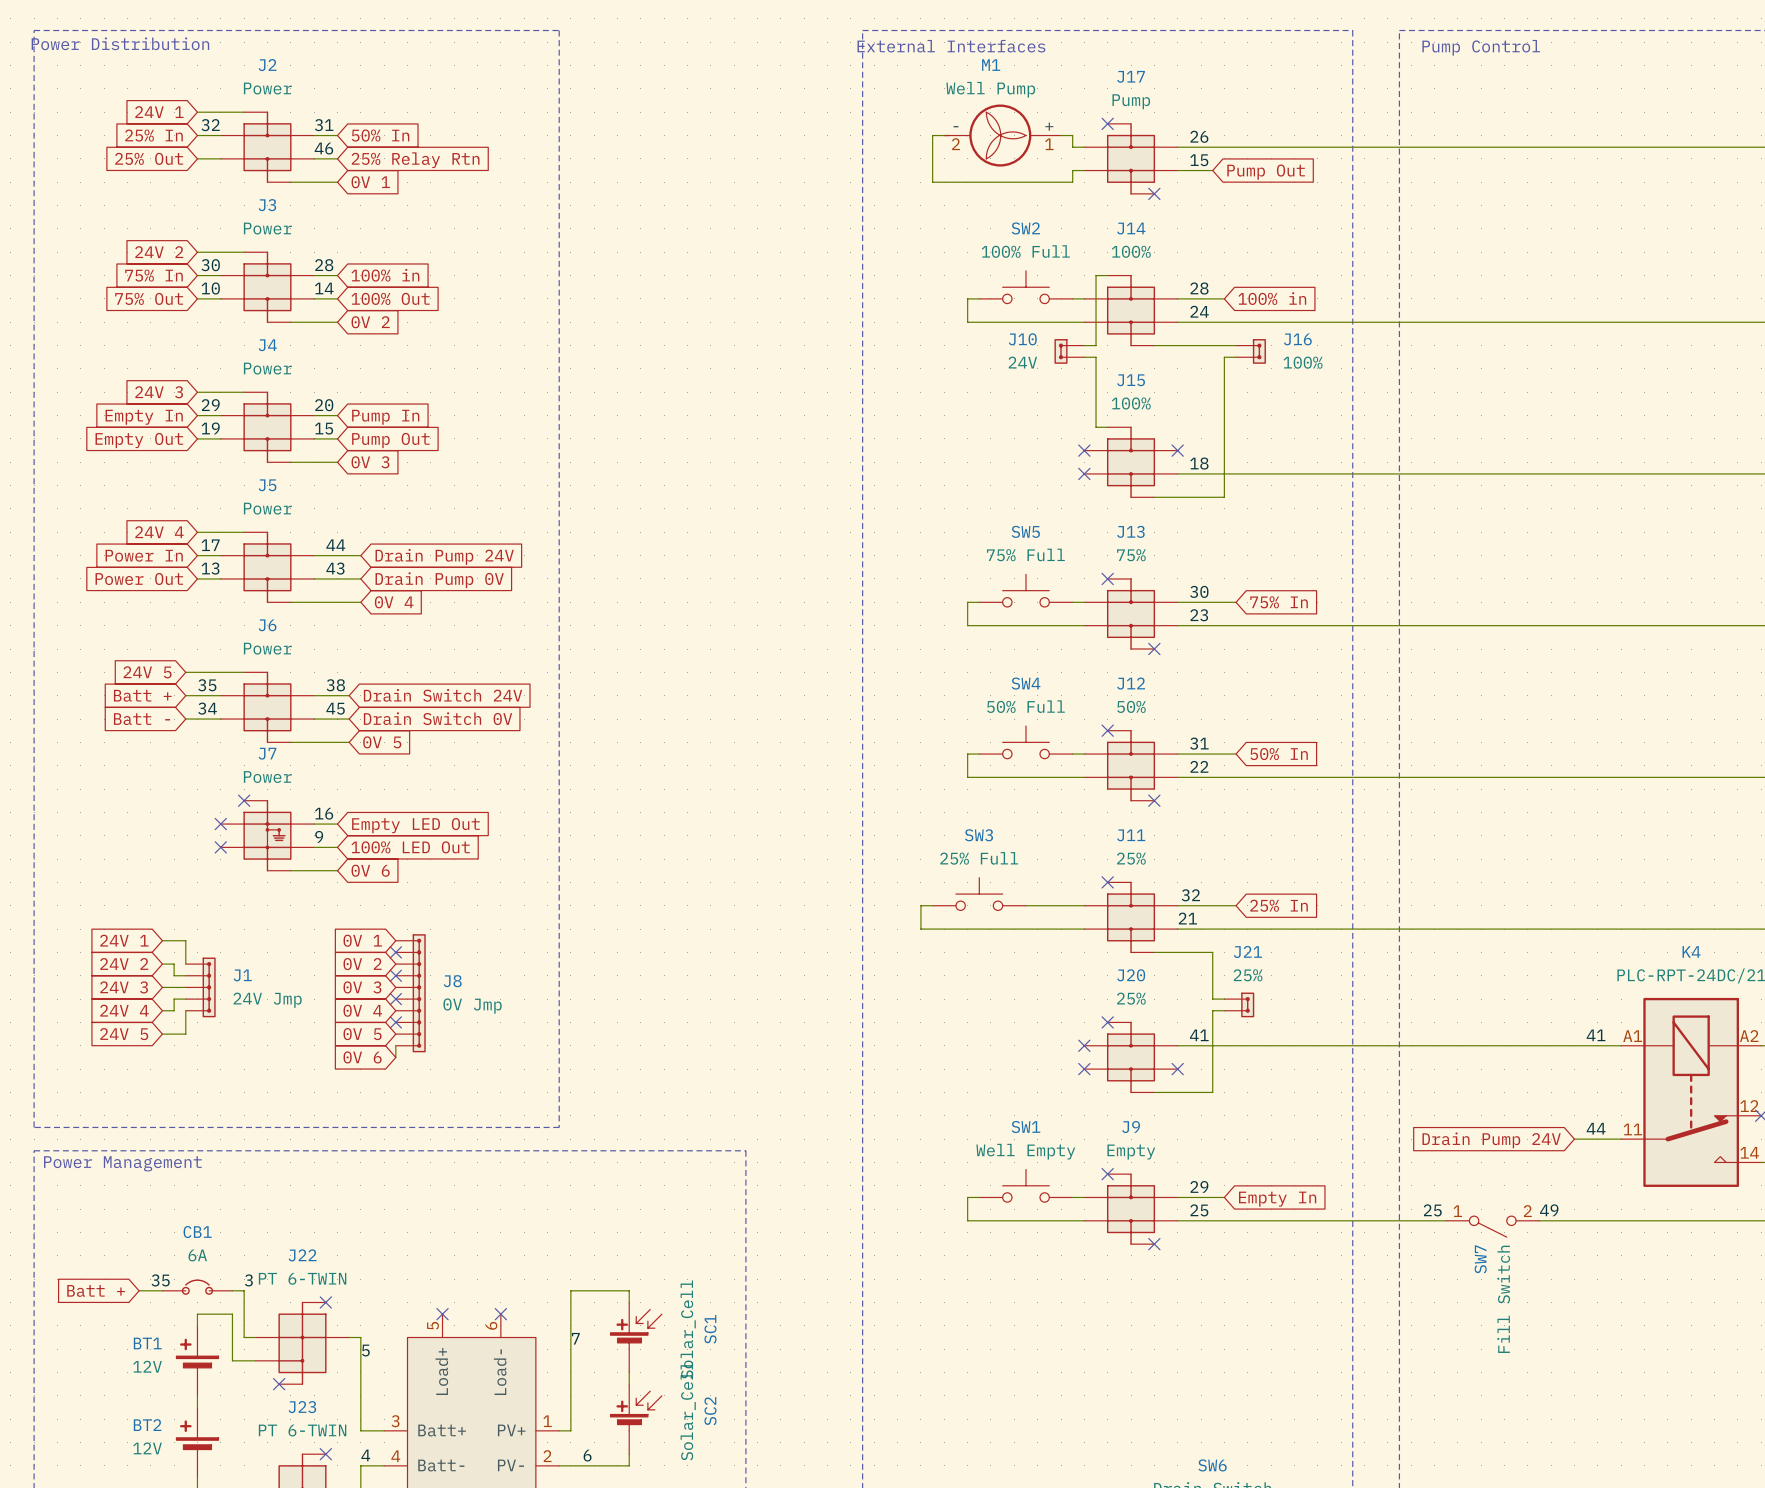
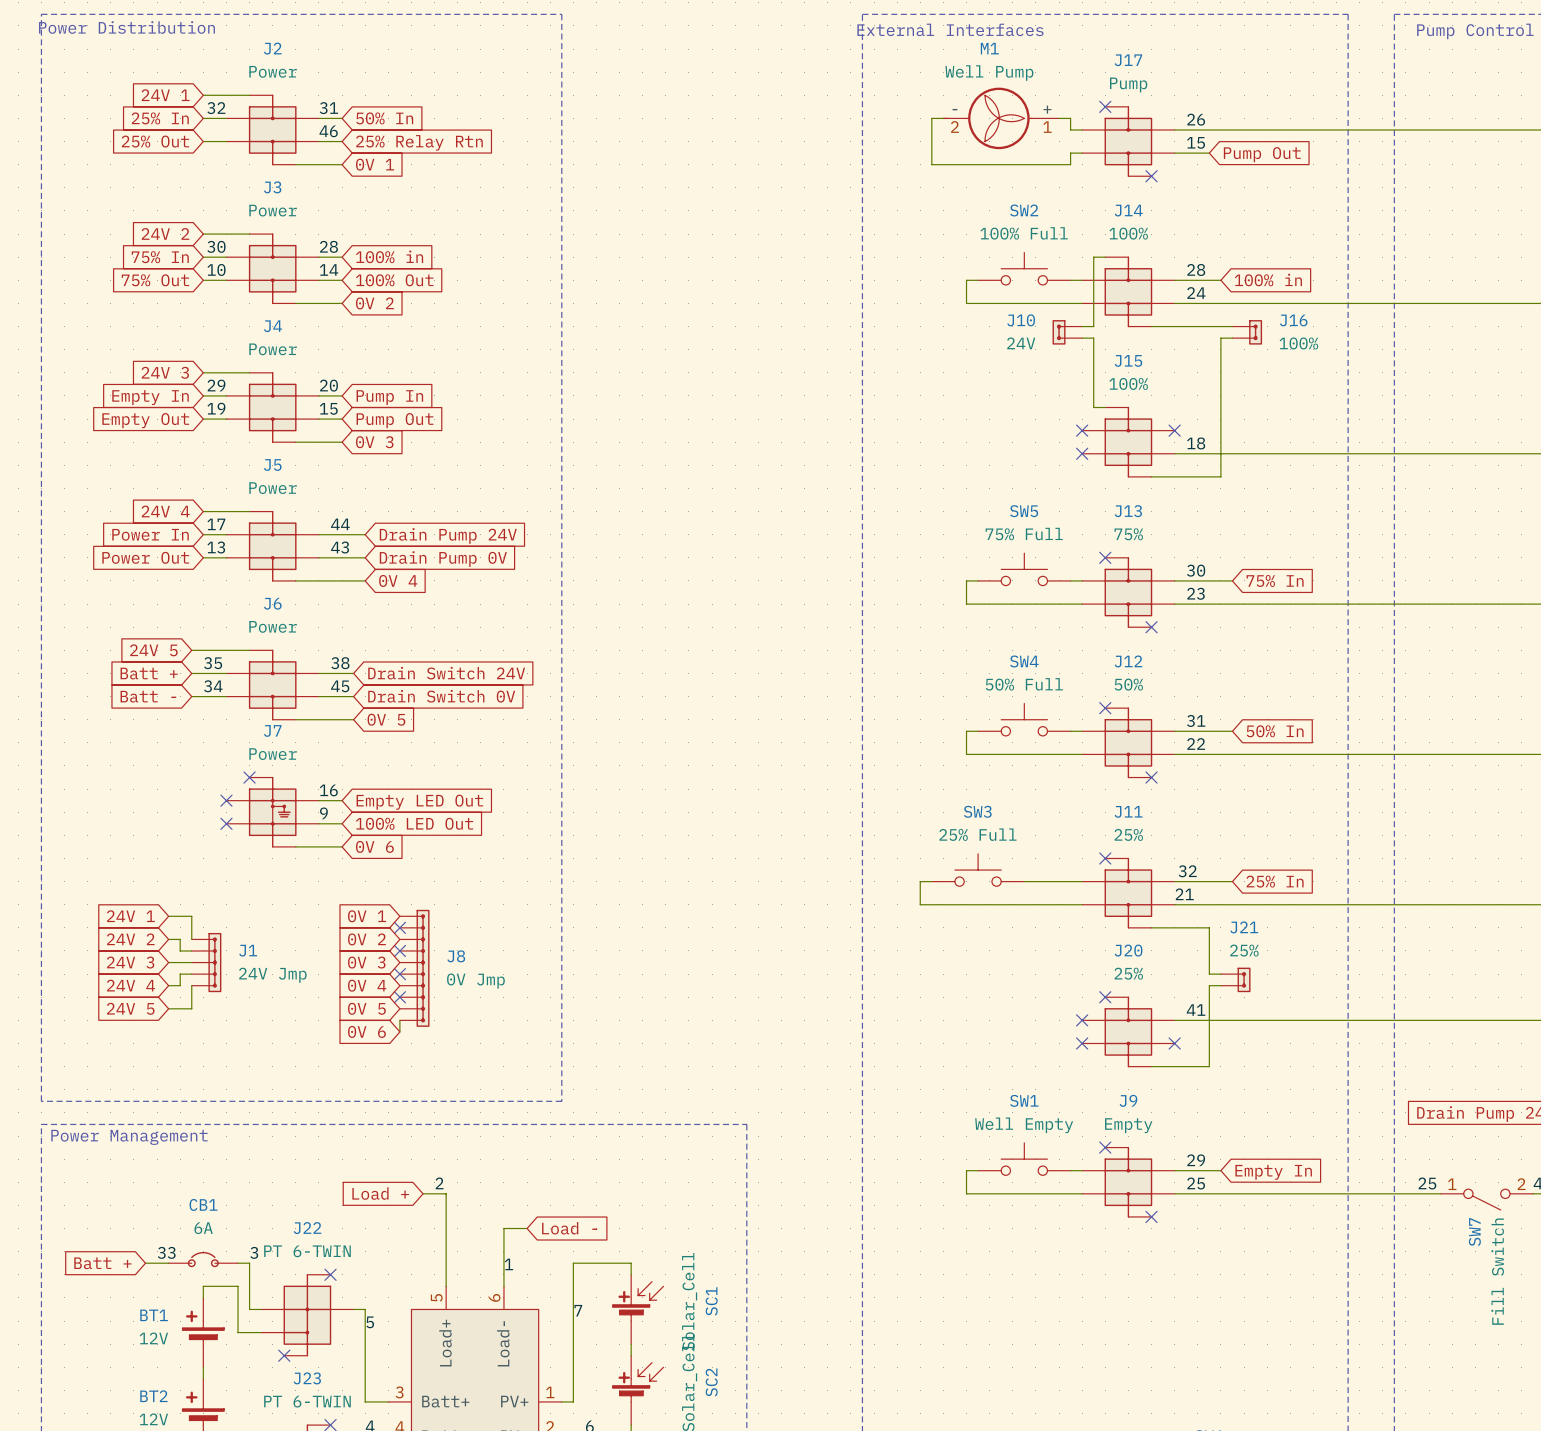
label: none -> 2 (439, 1183)
global label: none -> Load + (380, 1193)
wire: none -> (423, 1193) (446, 1193) (446, 1286)
wire: none -> (527, 1228) (503, 1228) (503, 1286)
global label: none -> Load - (569, 1228)
label: 35 (160, 1280) -> 33 (166, 1252)
label: none -> 1 (508, 1264)
no-connect mark: (442, 1314) -> none
no-connect mark: (500, 1314) -> none

